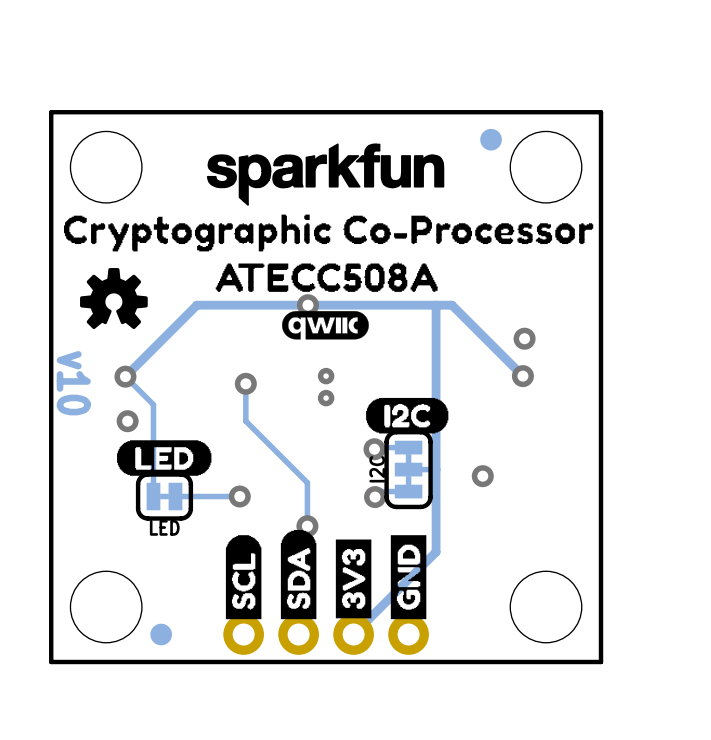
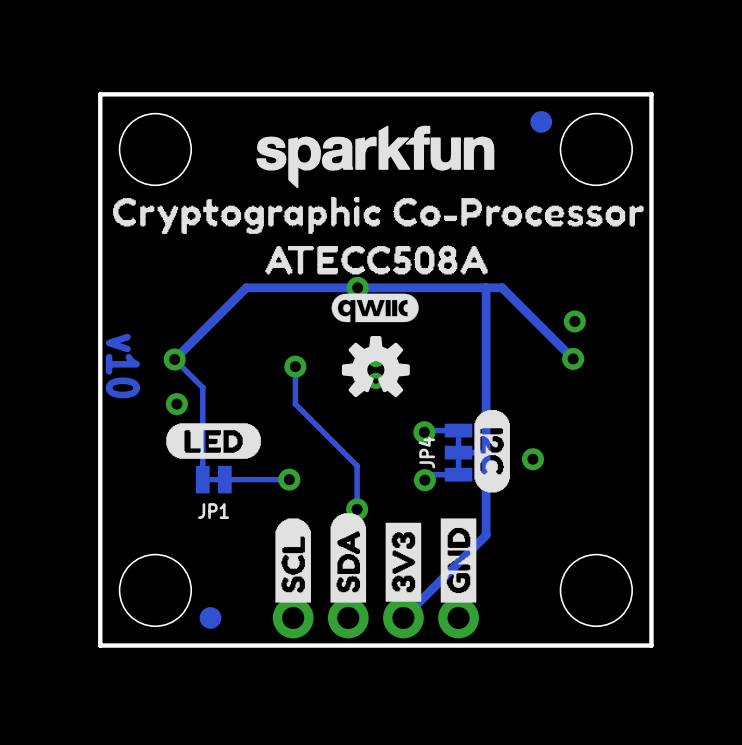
drawing position: (113, 298) -> (375, 366)
drawing: [366, 397, 449, 434] -> none
drawing: none -> [474, 410, 510, 493]
I2C: (408, 469) -> none
JP4: none -> (458, 452)
LED: (164, 496) -> none
JP1: none -> (213, 479)

